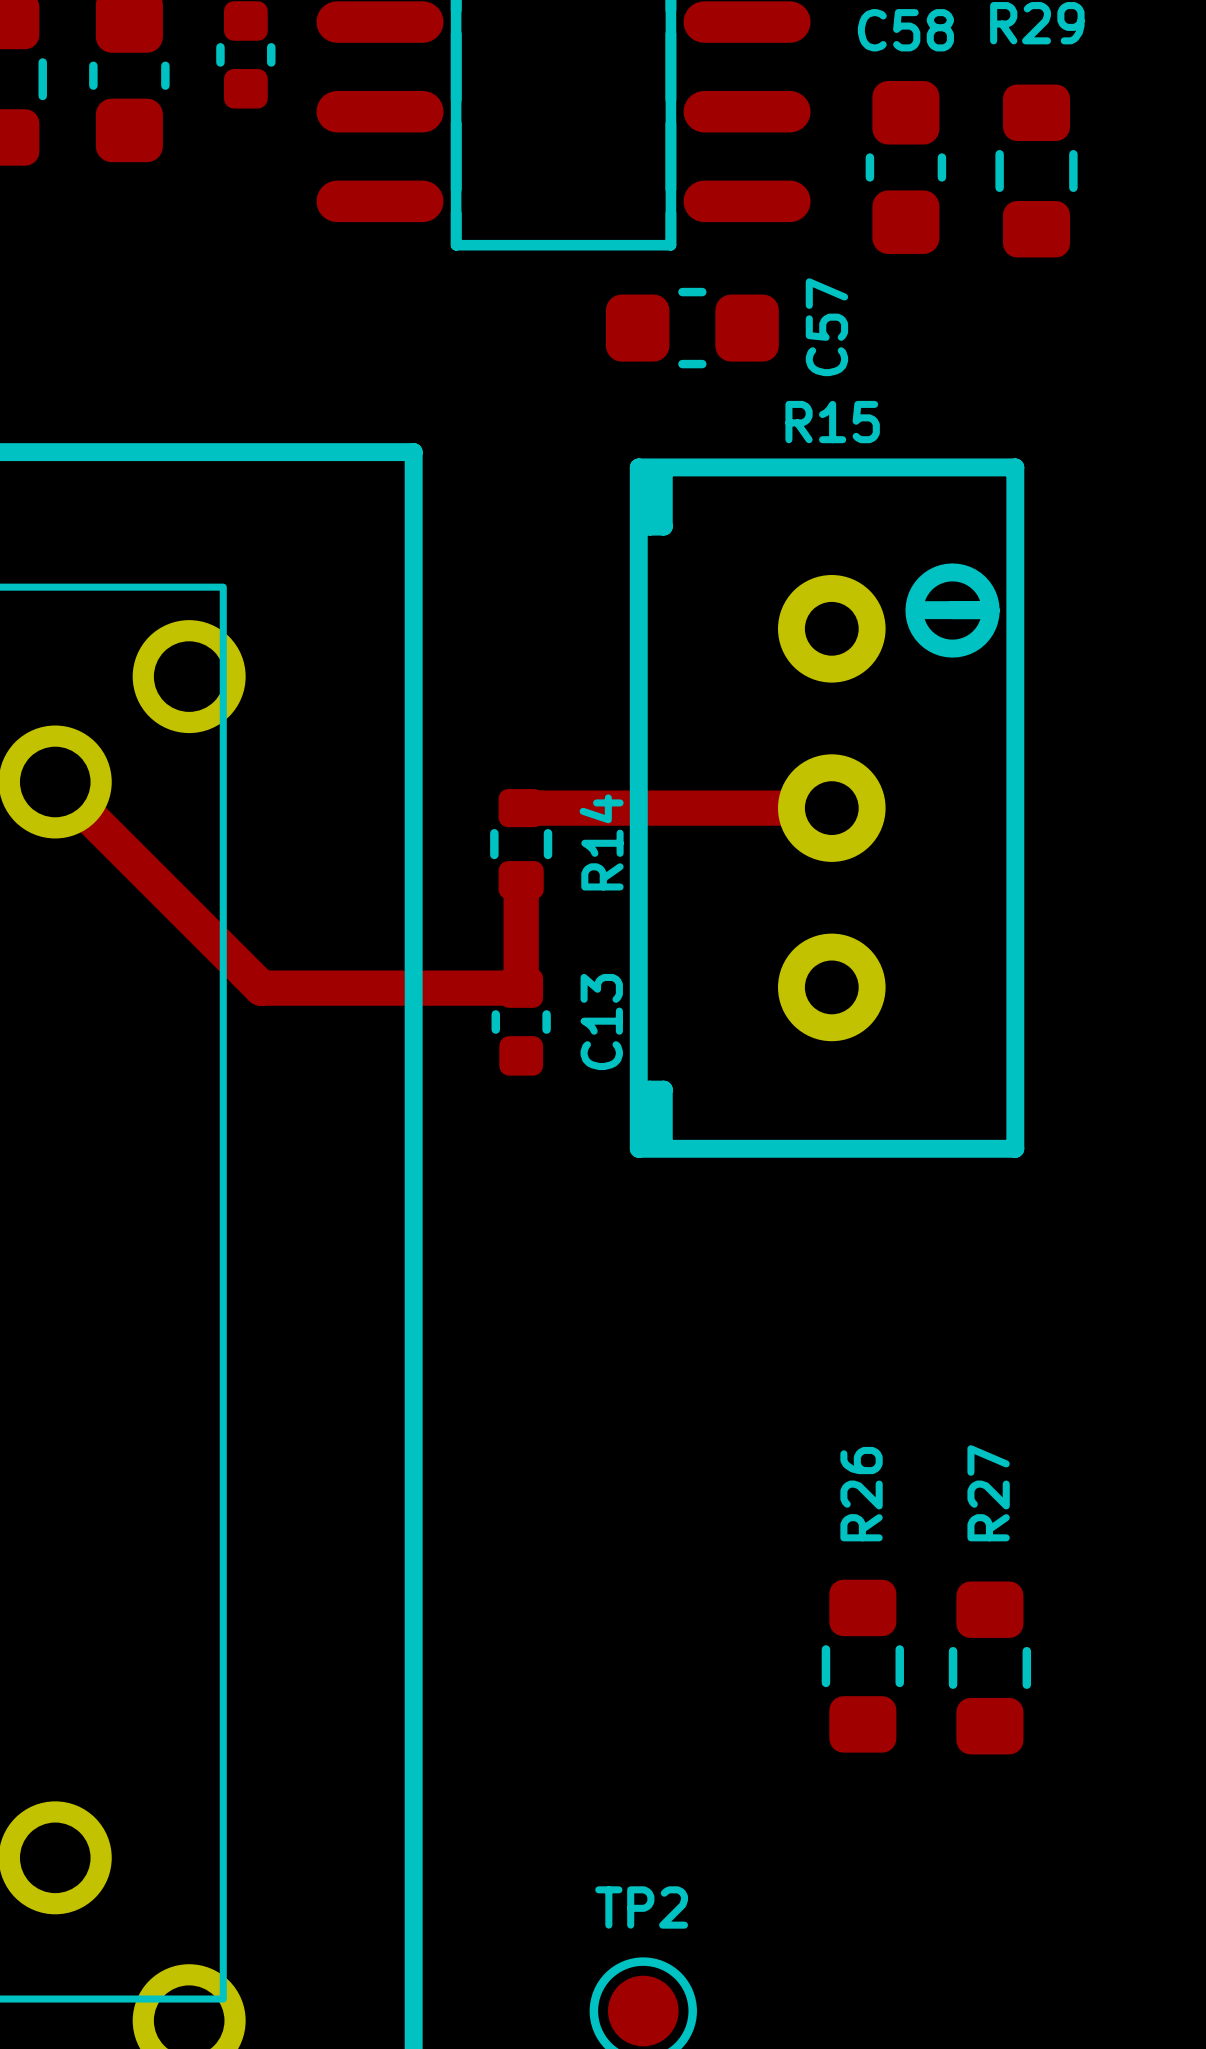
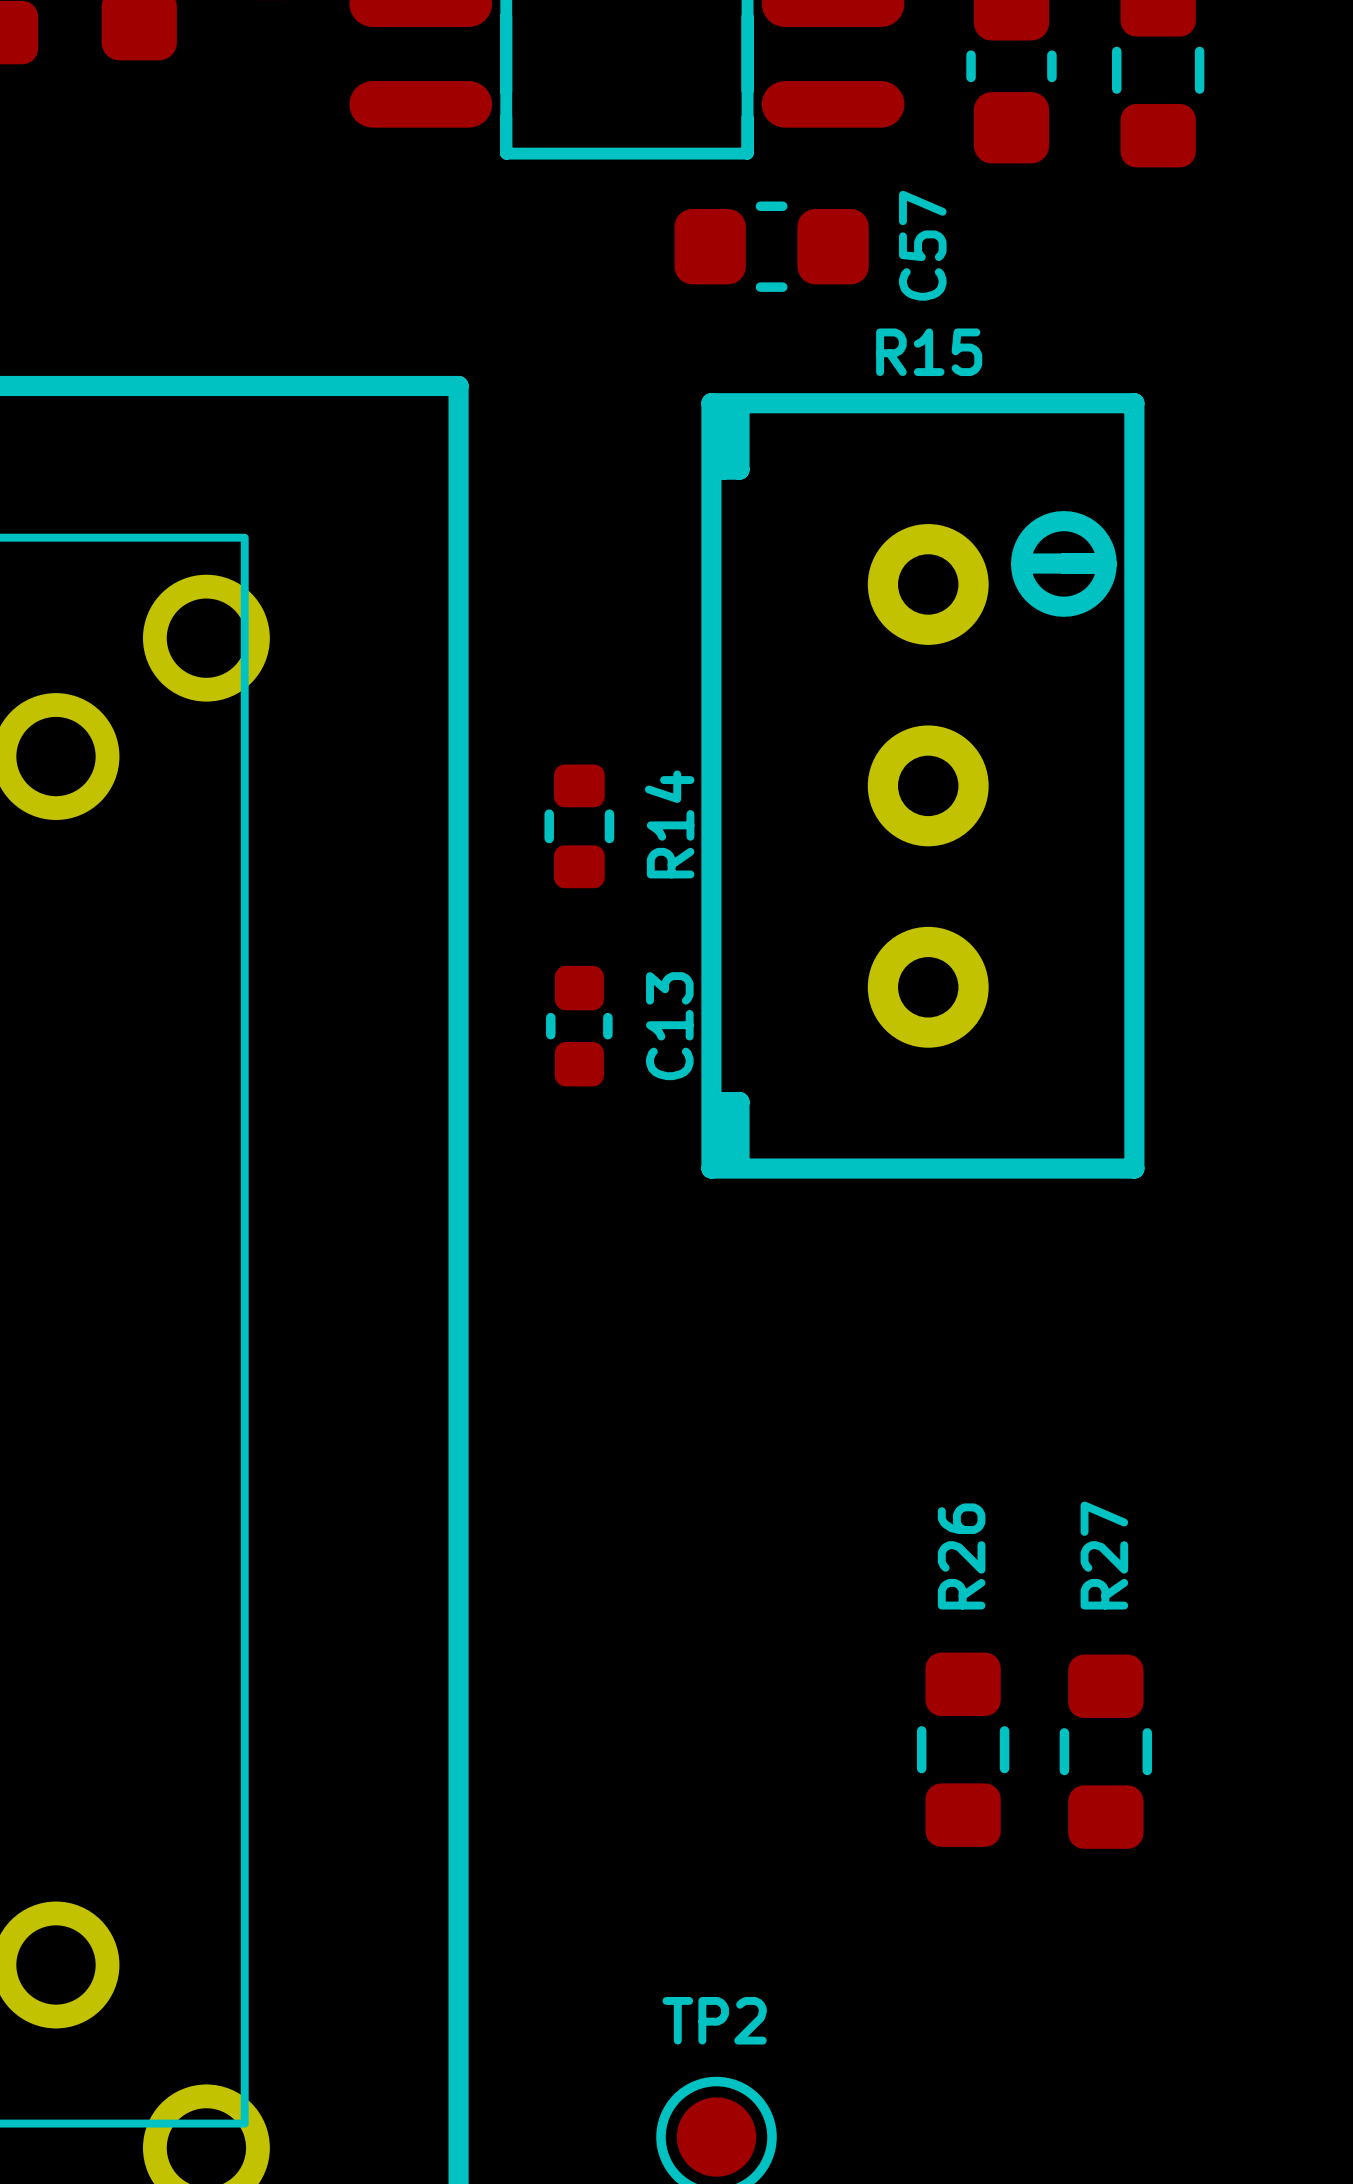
top track: (55, 781) (261, 988) (521, 988) (521, 880) -> none
top track: (521, 808) (831, 808) -> none

